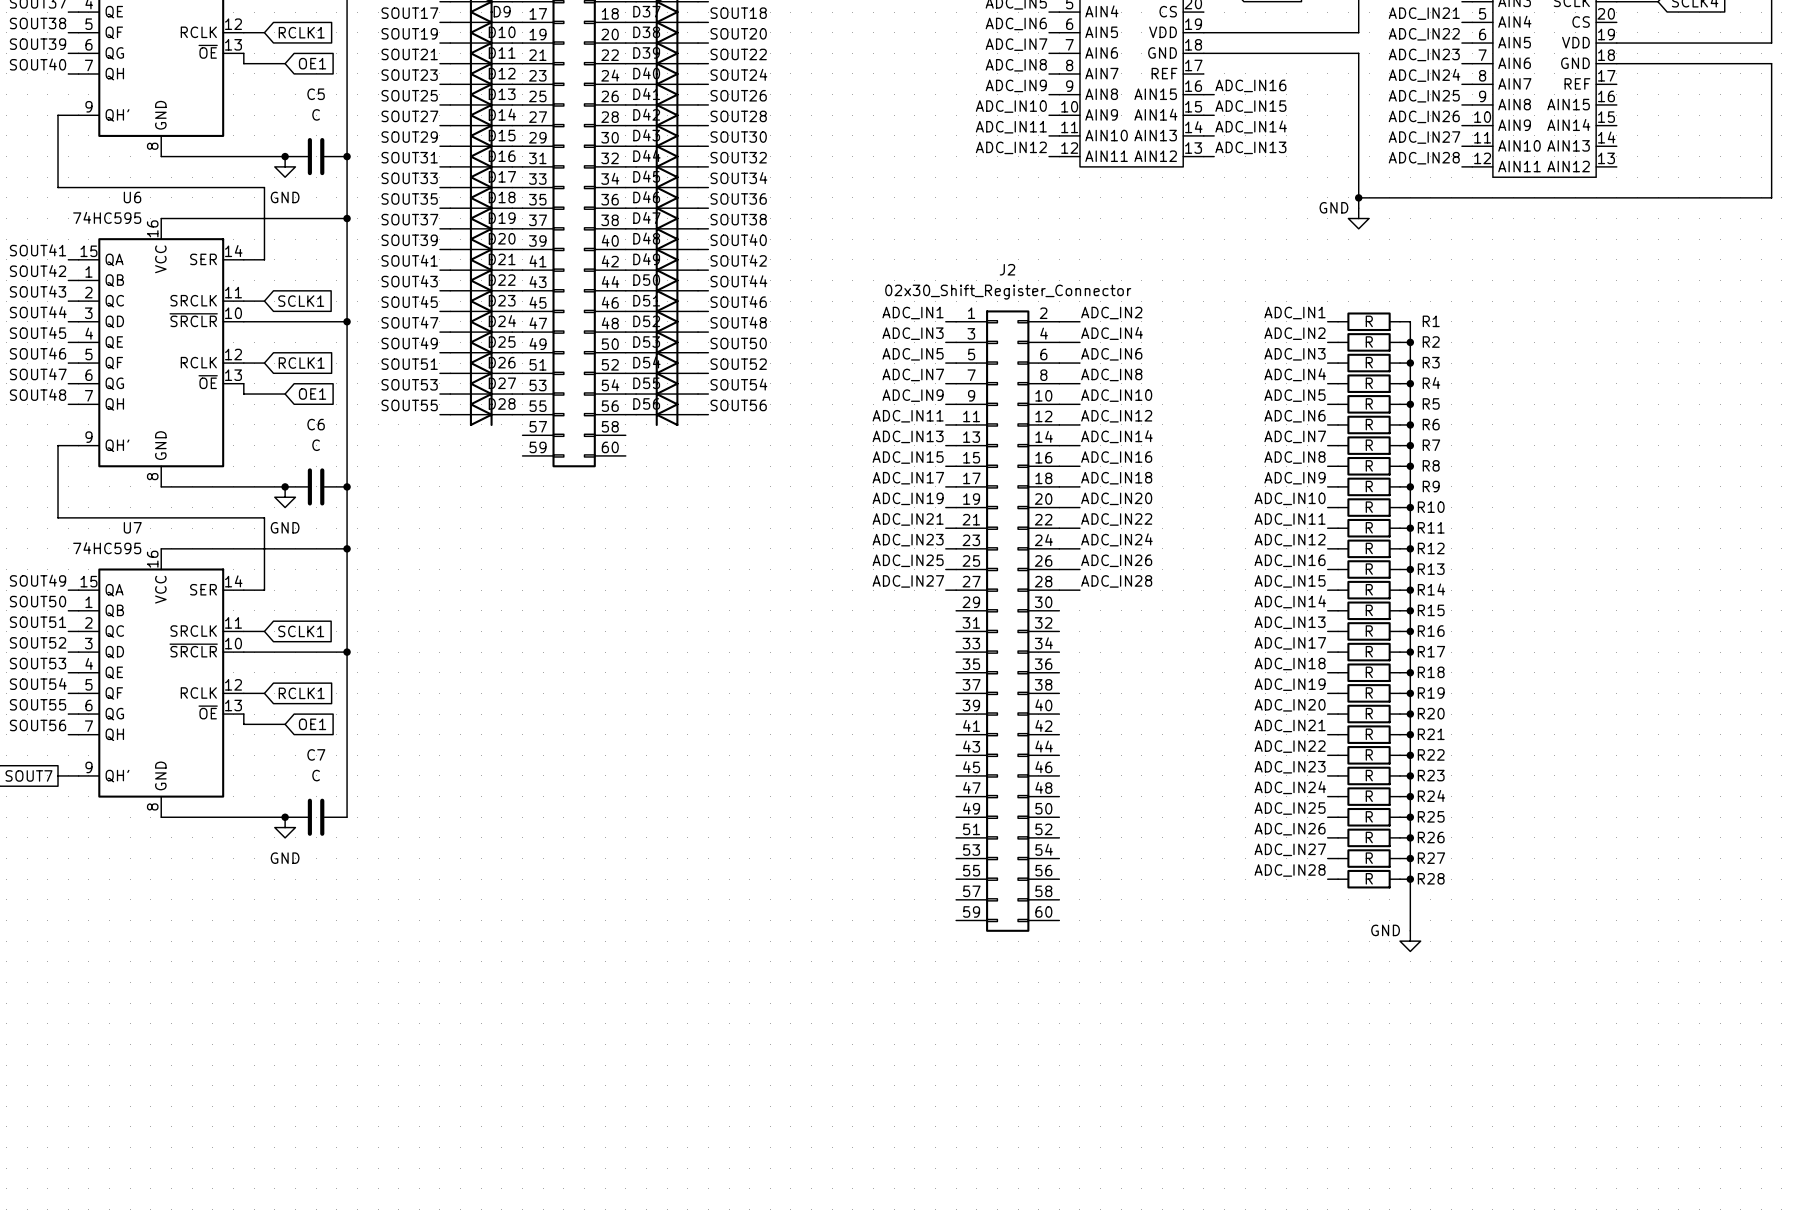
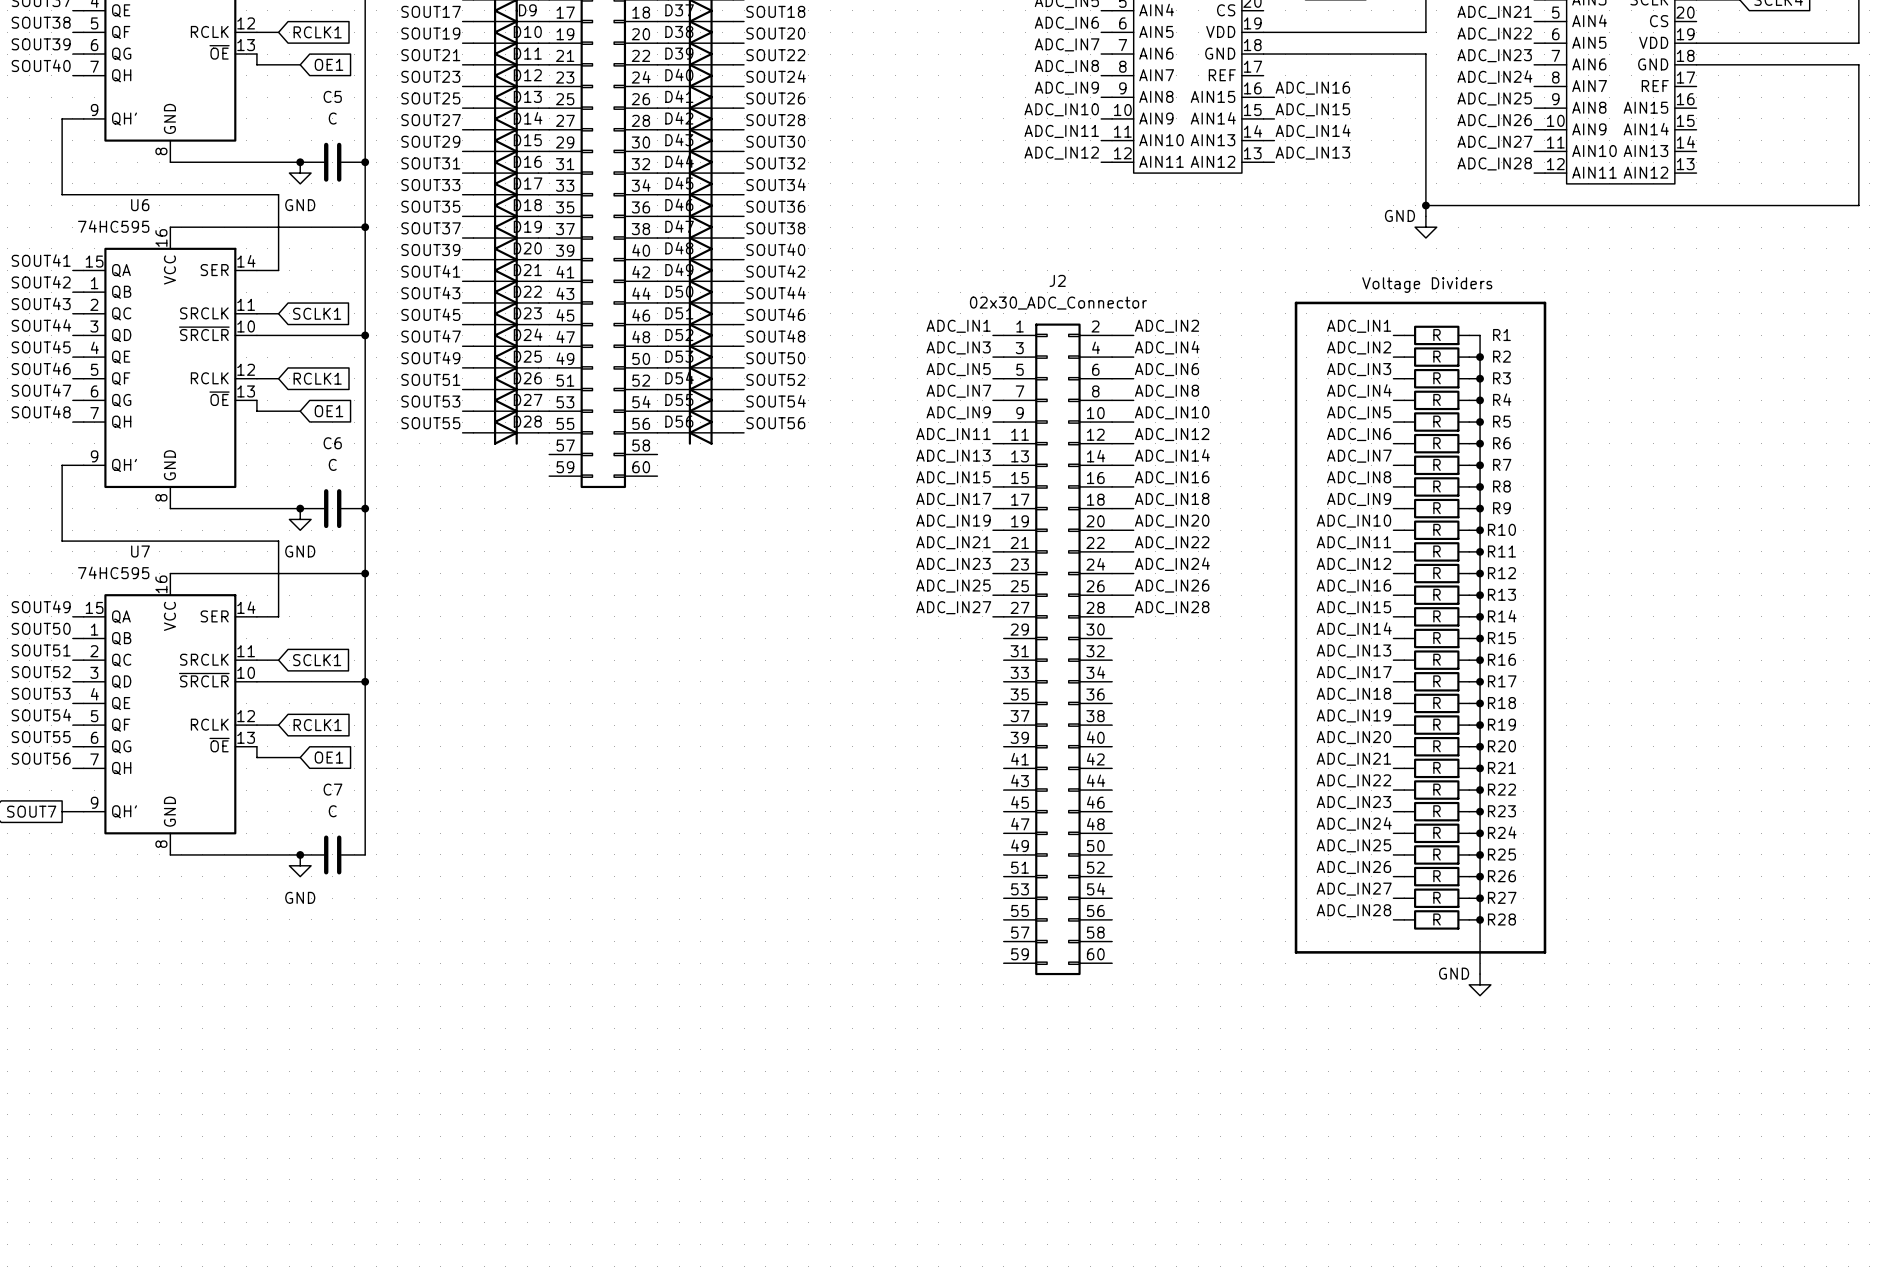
text: none -> Voltage Dividers (1427, 285)
line: none -> (1296, 302) (1544, 302) (1544, 952) (1296, 952) (1296, 302)
J2 value: 02x30_Shift_Register_Connector (1008, 292) -> 02x30_ADC_Connector (1058, 303)

